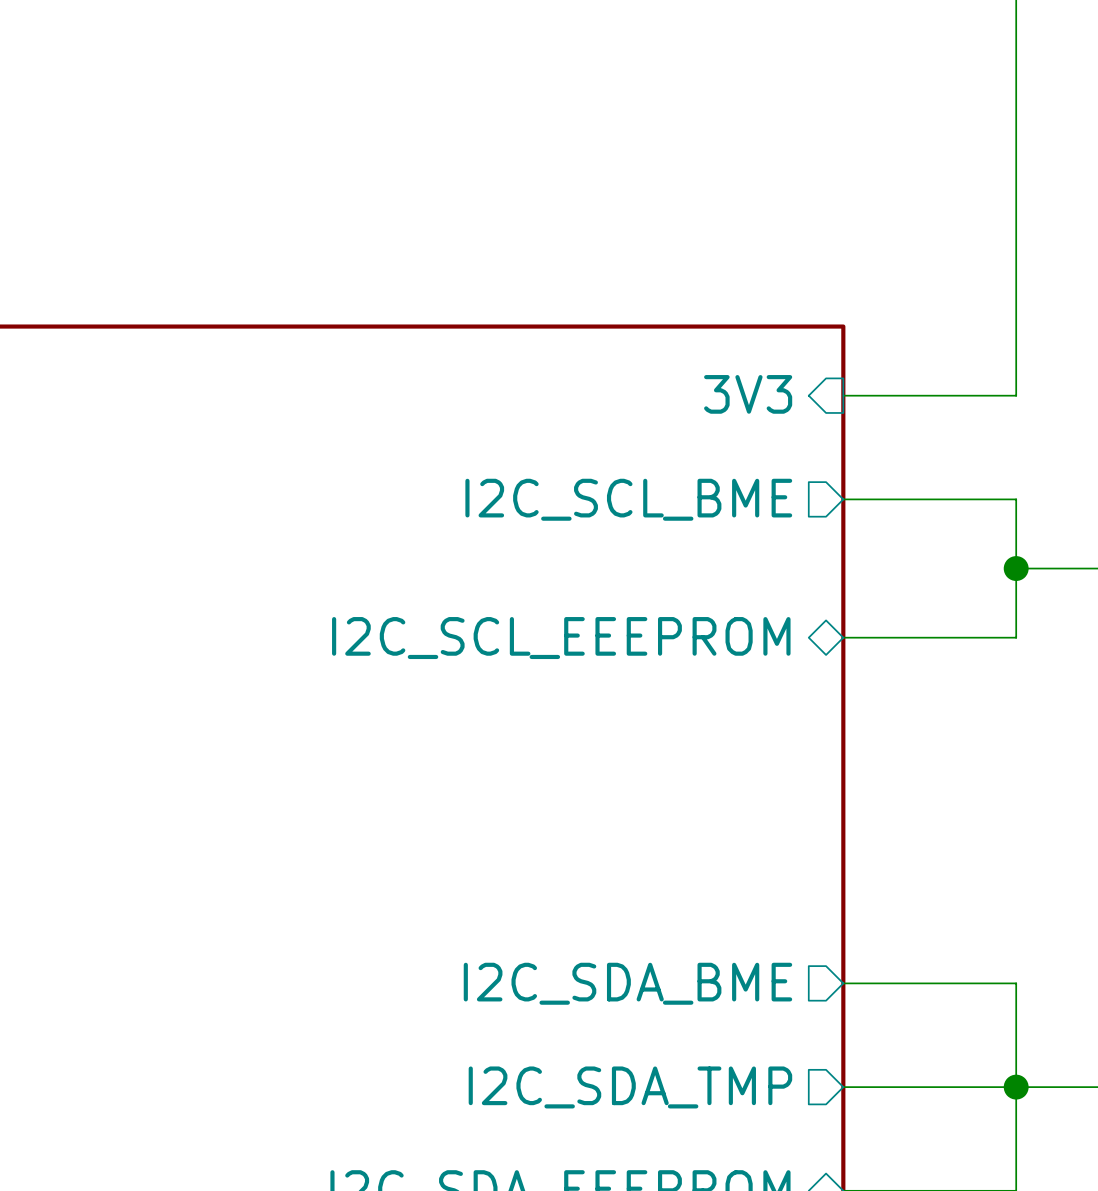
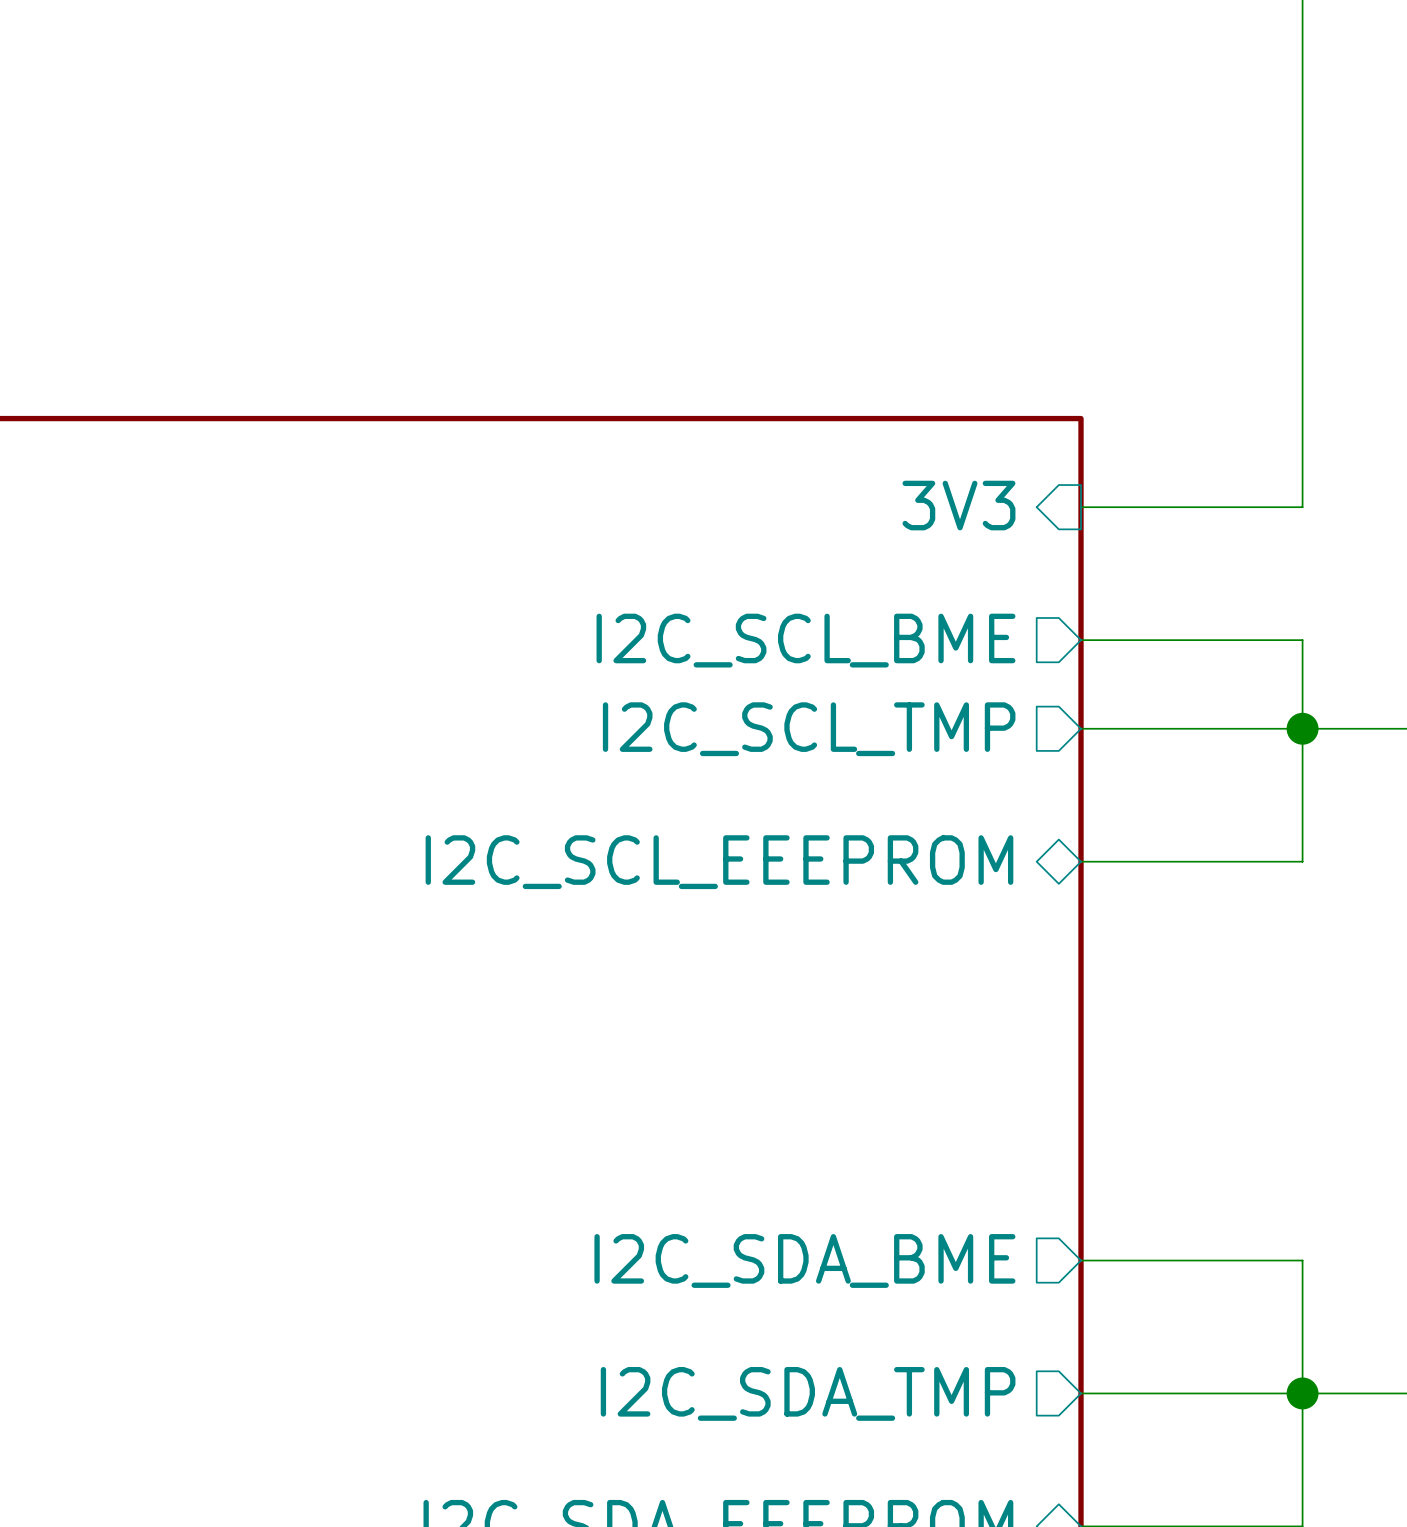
sheet pin: none -> I2C_SCL_TMP (809, 729)
wire: none -> (1081, 728) (1302, 728)
wire: (843, 637) (1016, 637) -> (1081, 861) (1302, 861) (1302, 817)
sheet pin position: I2C_SCL_EEEPROM (561, 638) -> I2C_SCL_EEEPROM (719, 862)

